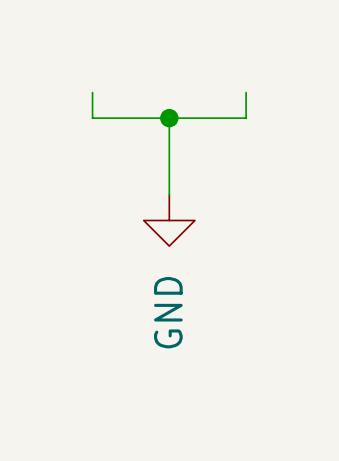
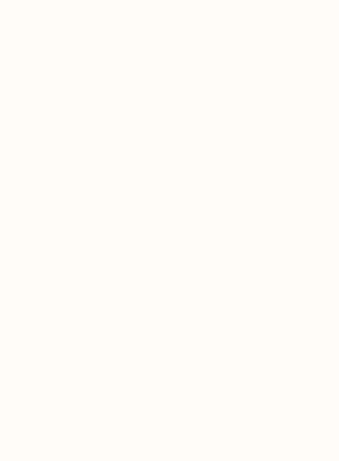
wire: (92, 92) (92, 118) (246, 118) (246, 92) -> none
wire: (169, 118) (169, 194) -> none
junction: (169, 118) -> none
power symbol: GND (169, 220) -> none

